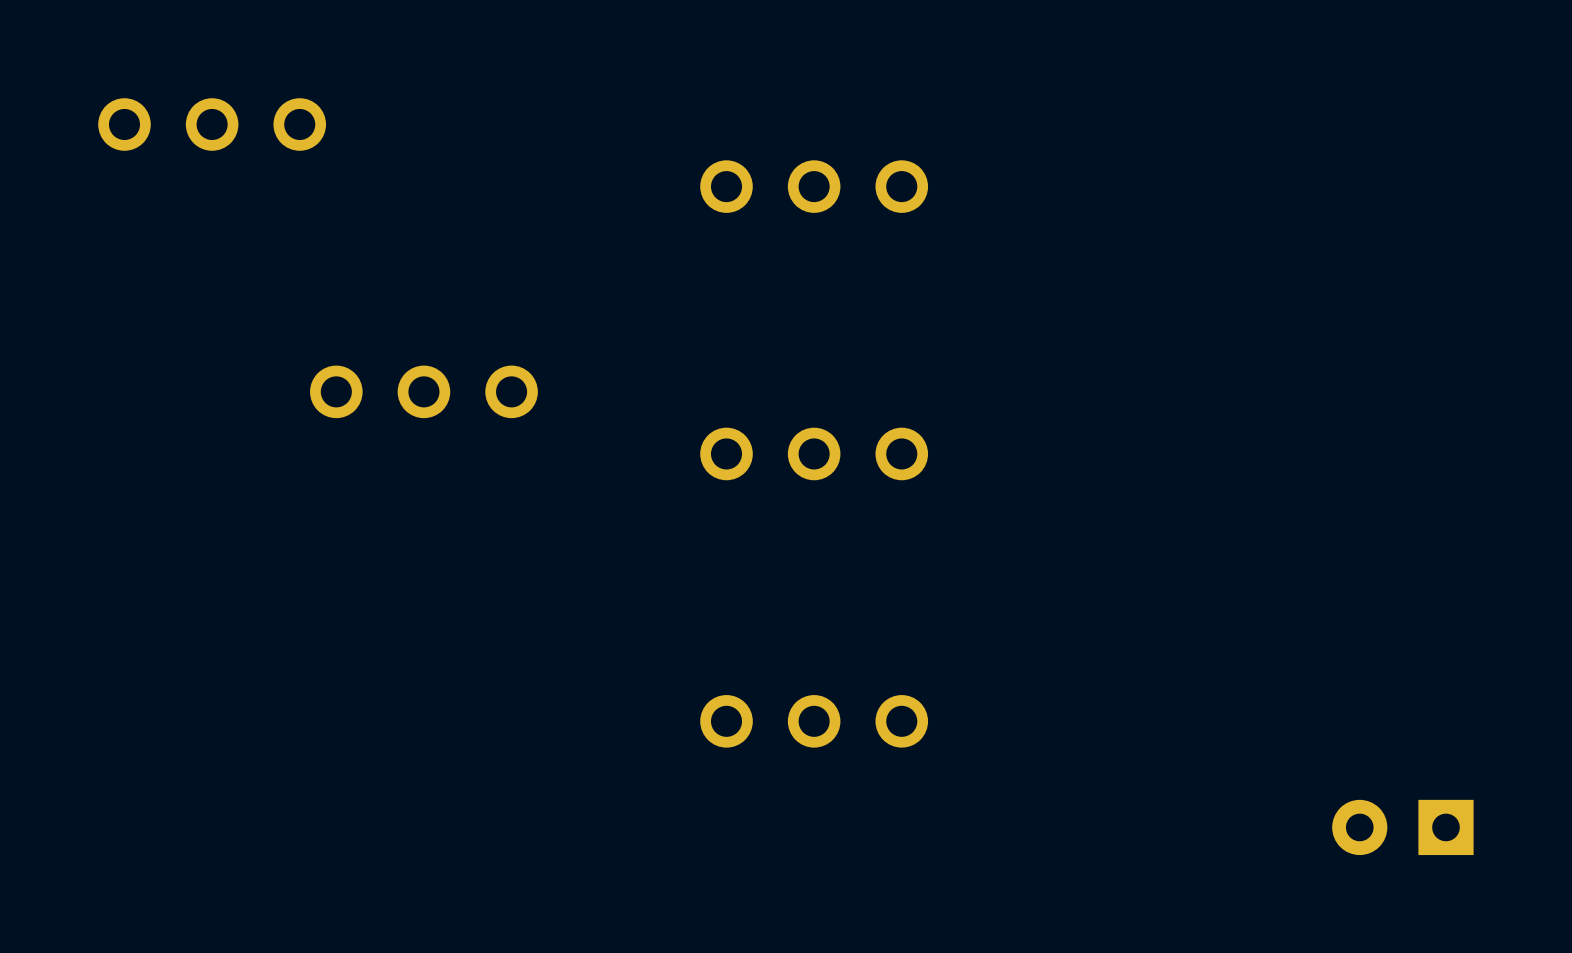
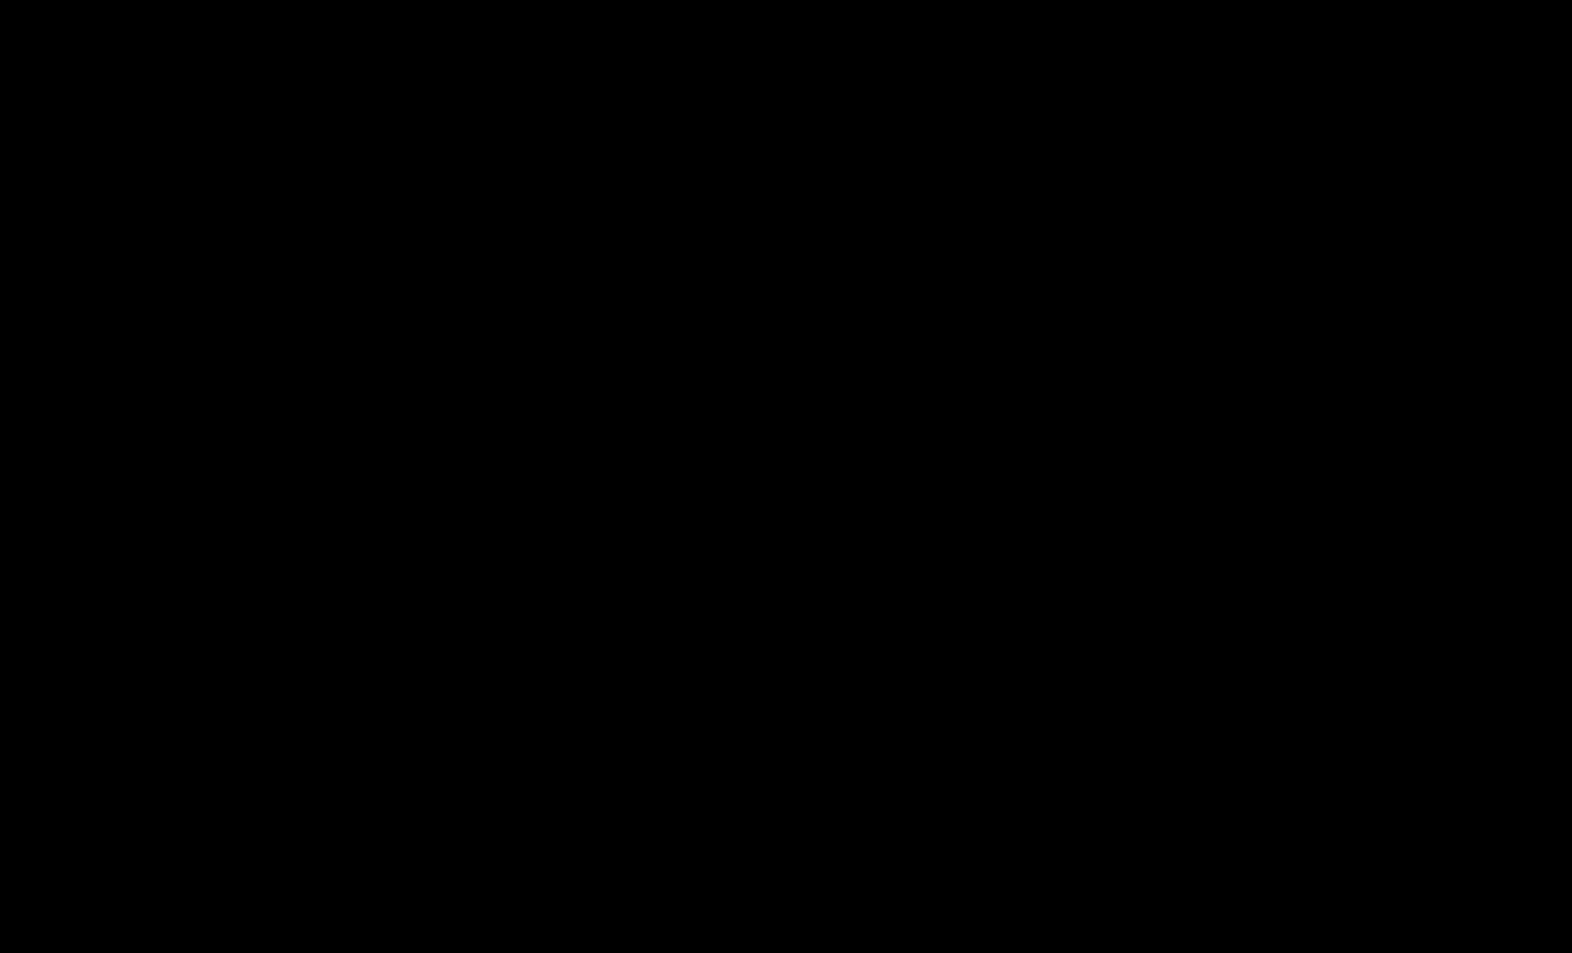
part: (212, 124) -> none
part: (814, 186) -> none
part: (423, 391) -> none
part: (814, 453) -> none
part: (814, 721) -> none
part: (1402, 827) -> none

